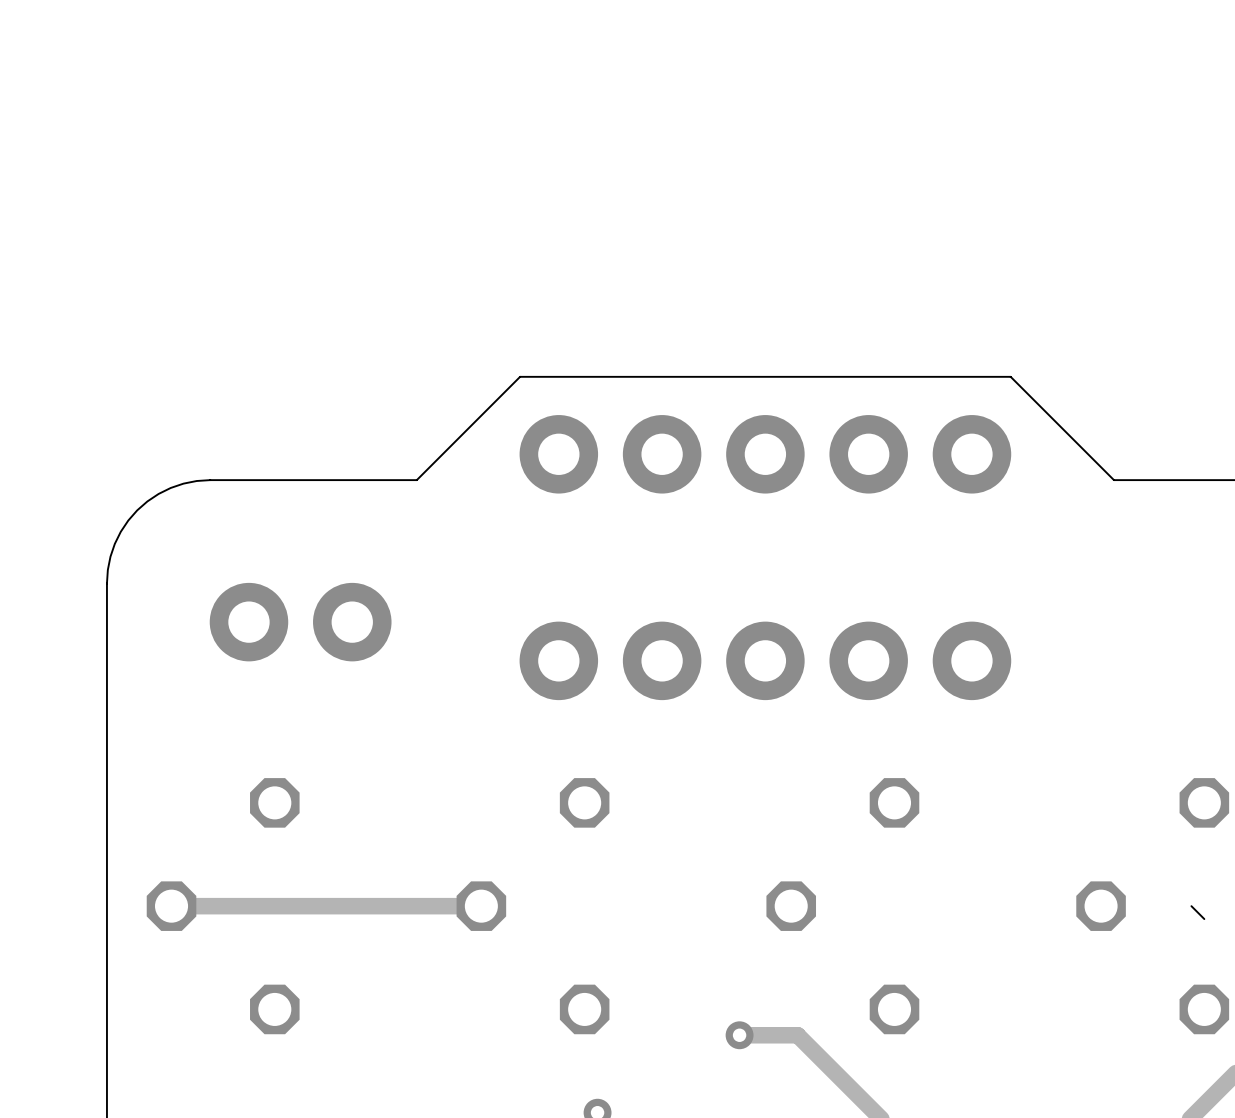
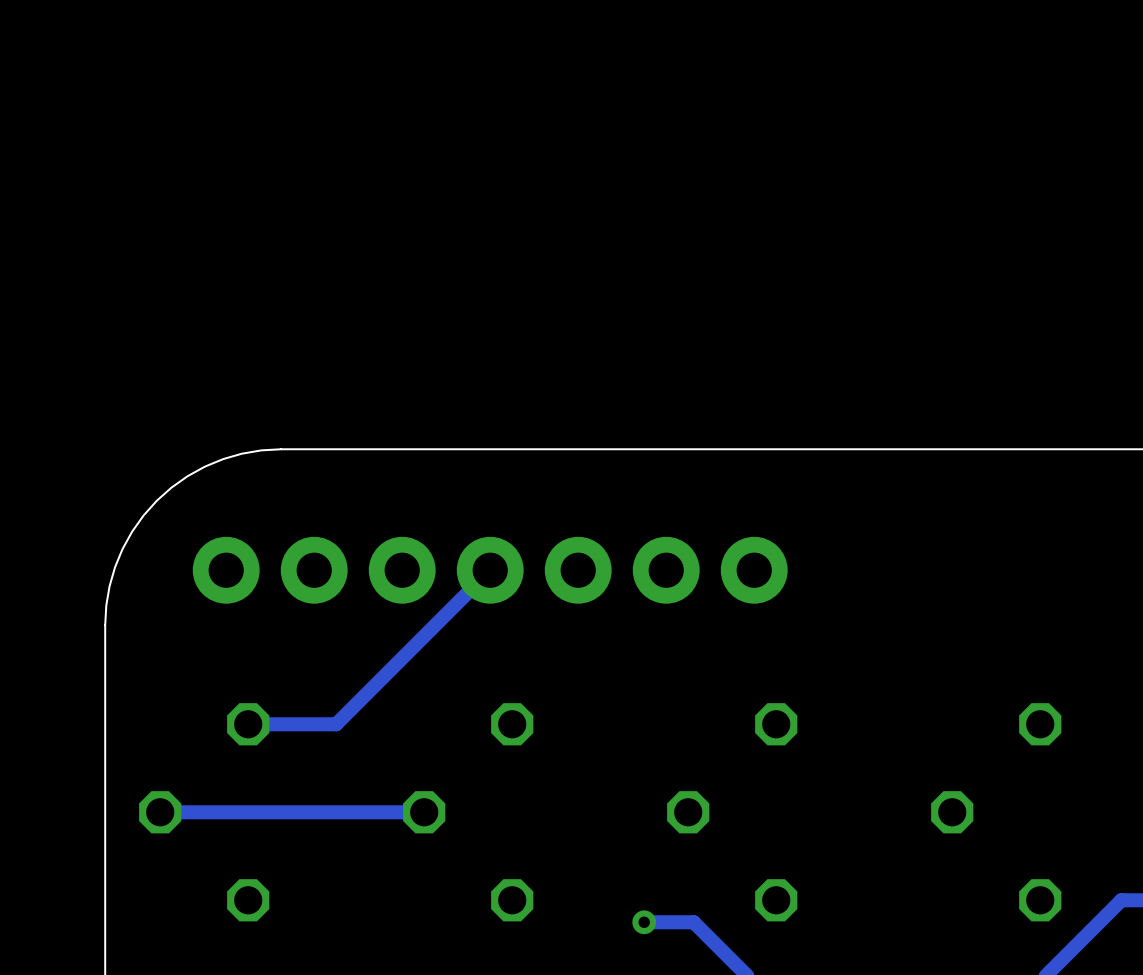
part: (765, 454) -> none
board edge: (313, 480) (196, 481) (170, 487) (147, 501) (137, 510) (128, 520) (114, 543) (107, 569) (106, 686) -> (281, 449) (242, 453) (204, 466) (187, 476) (156, 500) (132, 531) (122, 548) (109, 586) (105, 625)
board edge: (1113, 480) (1010, 376) (520, 376) (416, 480) -> (963, 449) (369, 449)
track: none -> (490, 570) (336, 724) (248, 724)
part: none -> (578, 570)
part: (765, 660) -> none
board edge: (1191, 906) (1204, 919) -> none

